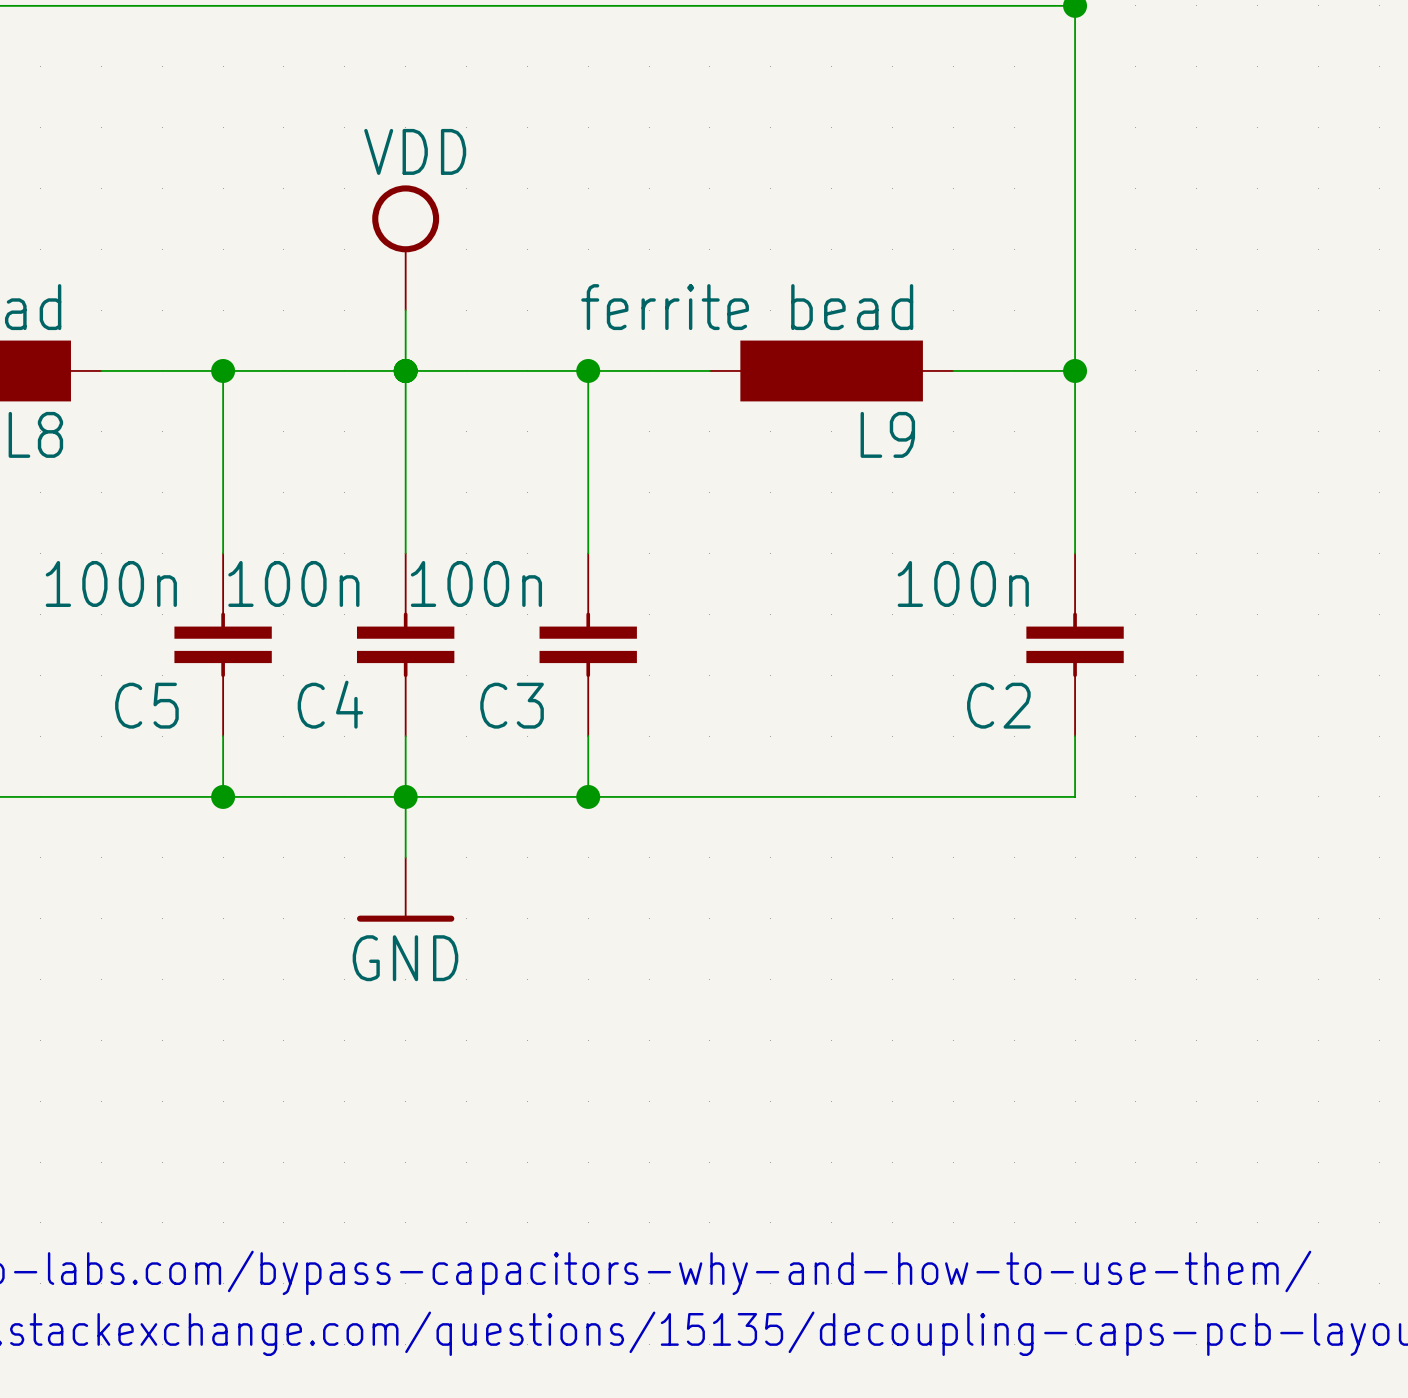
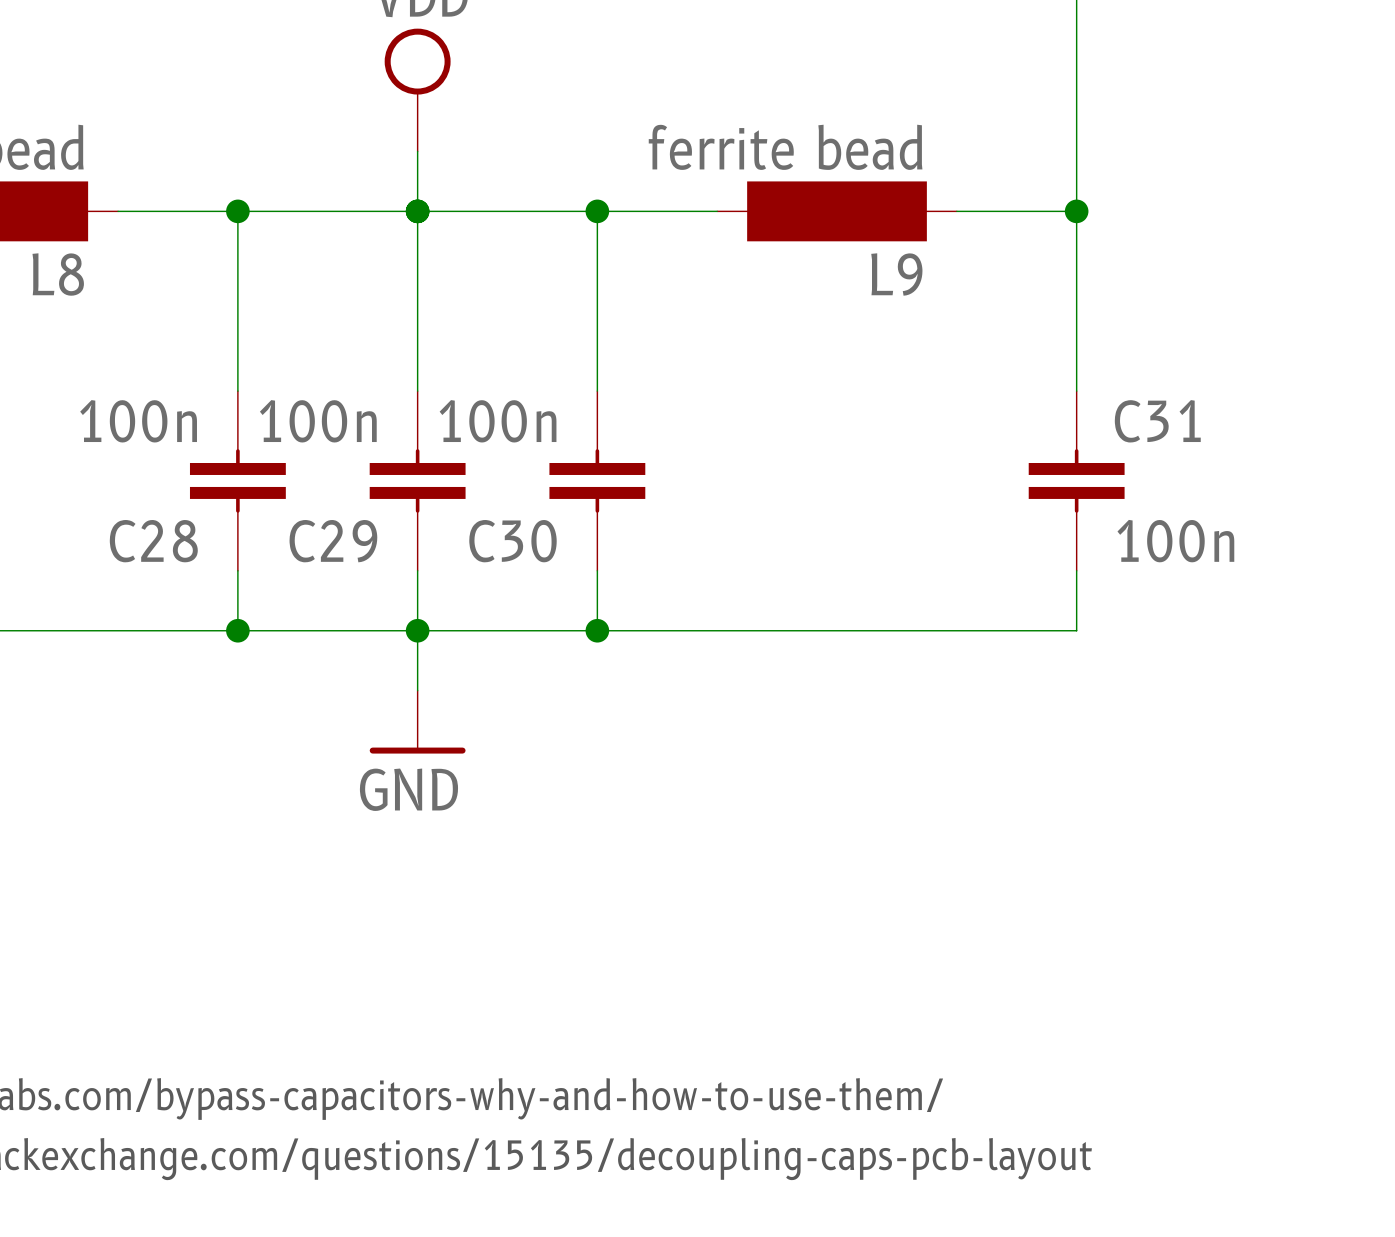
C2 value position: 100n (963, 583) -> 100n (1175, 541)
C4 name: C4 (330, 704) -> C29 (333, 541)
C5 name: C5 (146, 705) -> C28 (153, 541)
C3 name: C3 (512, 705) -> C30 (512, 541)
C2 name: C2 (998, 705) -> C31 (1157, 421)

